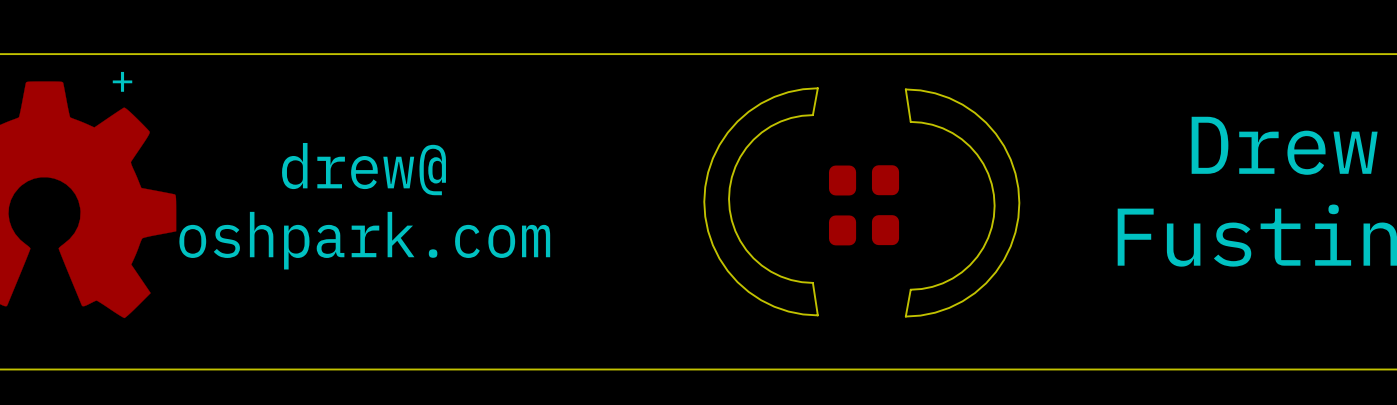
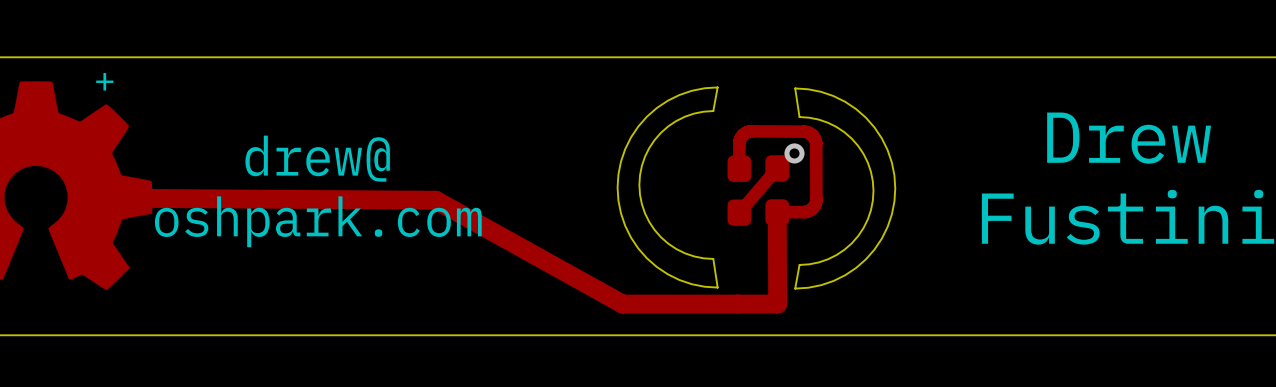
track: none -> (794, 153) (777, 168) (739, 212)
via: none -> (794, 153)
track: none -> (739, 168) (739, 141) (747, 132) (804, 131) (810, 133) (815, 139) (814, 205) (806, 211) (777, 212) (777, 304) (622, 304) (435, 200) (98, 198)

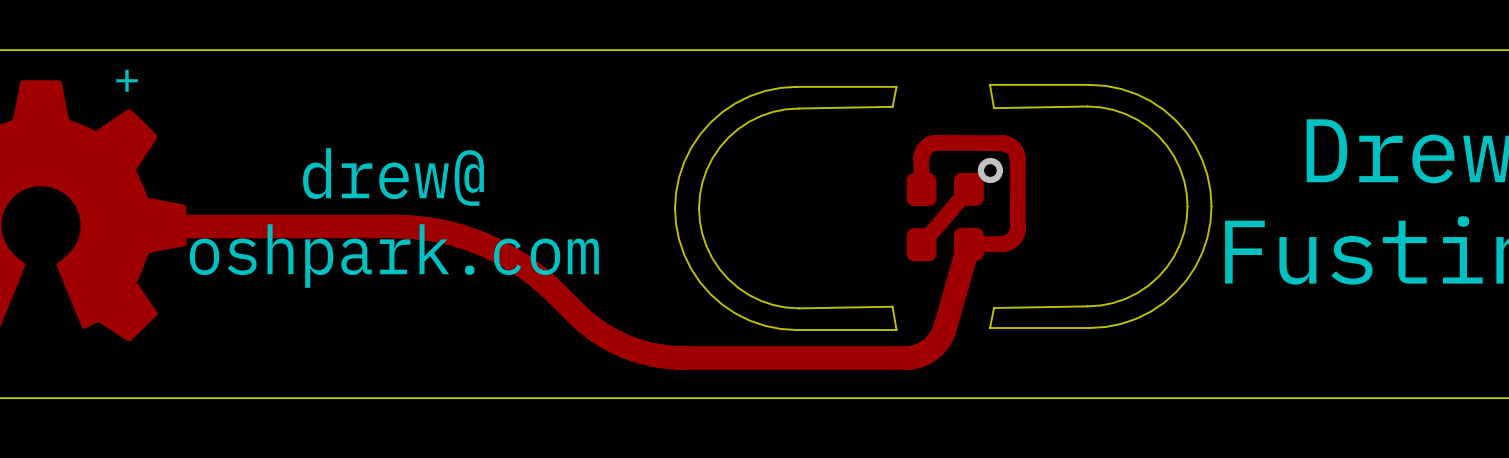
board edge: (717, 87) (713, 111) (685, 116) (668, 126) (654, 139) (645, 156) (639, 185) (645, 213) (654, 230) (668, 243) (685, 253) (713, 258) (717, 287) (691, 284) (679, 279) (667, 274) (646, 258) (638, 248) (625, 225) (620, 213) (617, 187) (620, 161) (625, 149) (638, 126) (646, 116) (667, 100) (679, 95) (691, 90) (717, 87) -> (796, 86) (765, 91) (735, 103) (710, 122) (691, 147) (679, 176) (676, 192) (676, 224) (684, 254) (700, 282) (710, 294) (735, 313) (750, 320) (765, 325) (796, 330) (896, 330) (892, 306) (798, 308) (773, 304) (760, 300) (749, 294) (728, 279) (712, 258) (706, 246) (702, 234) (699, 208) (702, 182) (712, 158) (728, 137) (738, 129) (760, 116) (785, 109) (892, 106) (896, 86) (796, 86)
board edge: (795, 88) (799, 117) (827, 122) (844, 132) (858, 145) (870, 171) (873, 191) (870, 210) (858, 236) (844, 249) (827, 259) (799, 264) (795, 288) (821, 285) (833, 280) (845, 275) (865, 259) (874, 249) (887, 226) (891, 214) (895, 188) (891, 162) (887, 150) (874, 127) (865, 117) (845, 101) (833, 96) (821, 91) (795, 88) -> (990, 84) (994, 108) (1100, 107) (1113, 109) (1137, 119) (1158, 135) (1174, 156) (1184, 180) (1187, 206) (1184, 232) (1174, 256) (1158, 277) (1137, 292) (1125, 298) (1100, 305) (994, 308) (990, 328) (1105, 326) (1136, 318) (1163, 302) (1186, 280) (1195, 267) (1207, 237) (1210, 222) (1210, 190) (1207, 174) (1202, 159) (1186, 132) (1175, 120) (1150, 101) (1121, 89) (1089, 84) (990, 84)
track: (98, 198) (435, 200) (622, 304) (777, 304) (777, 212) -> (118, 226) (394, 226) (428, 228) (460, 236) (502, 253) (539, 278) (566, 304)
track: none -> (968, 244) (941, 337) (927, 351) (915, 356) (905, 358)
track: none -> (568, 306) (587, 323) (612, 340) (639, 351) (661, 356) (904, 358)

